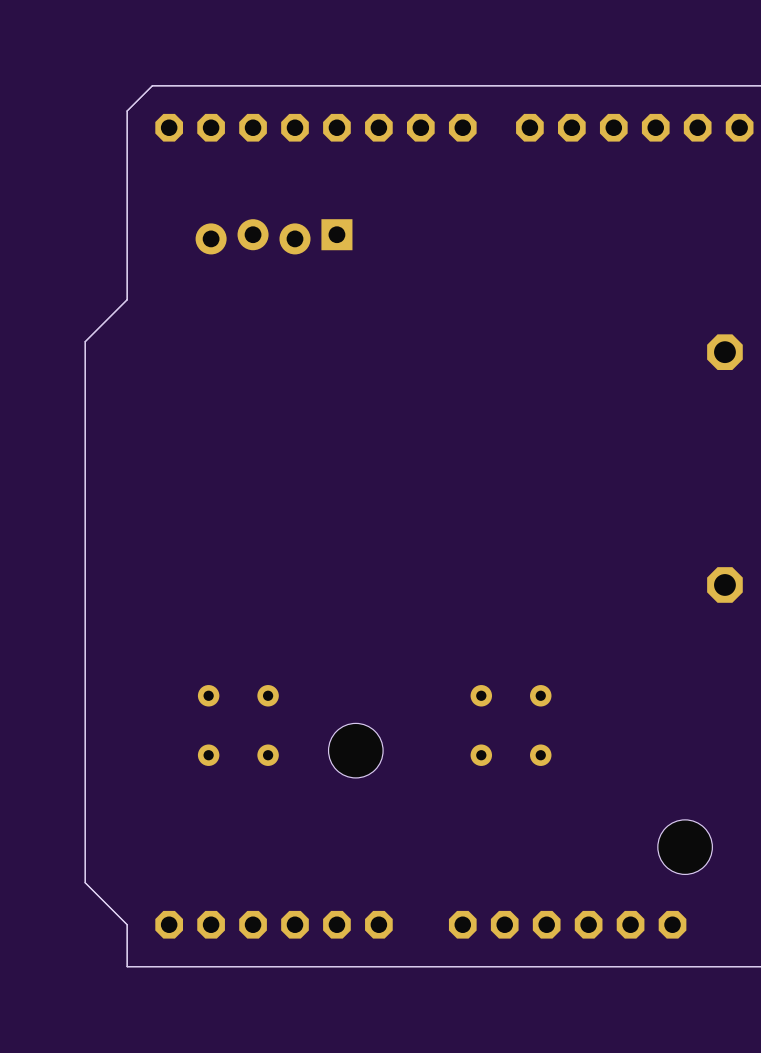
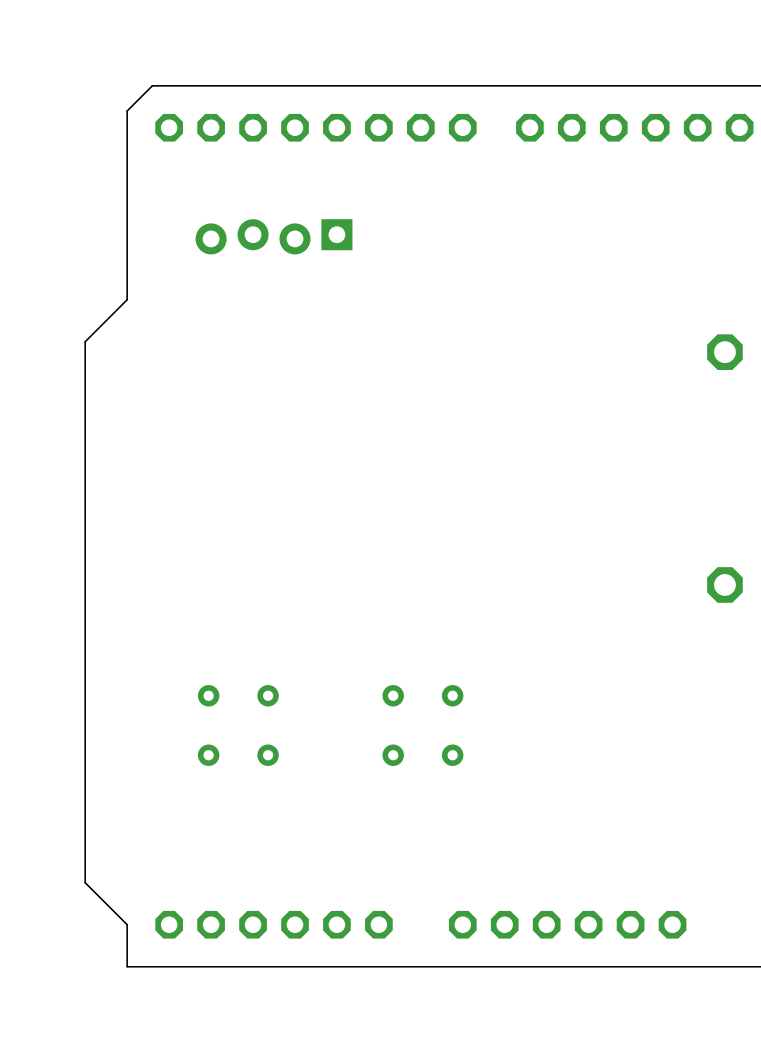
part position: (511, 725) -> (422, 725)
part: (355, 750) -> none
part: (685, 847) -> none

